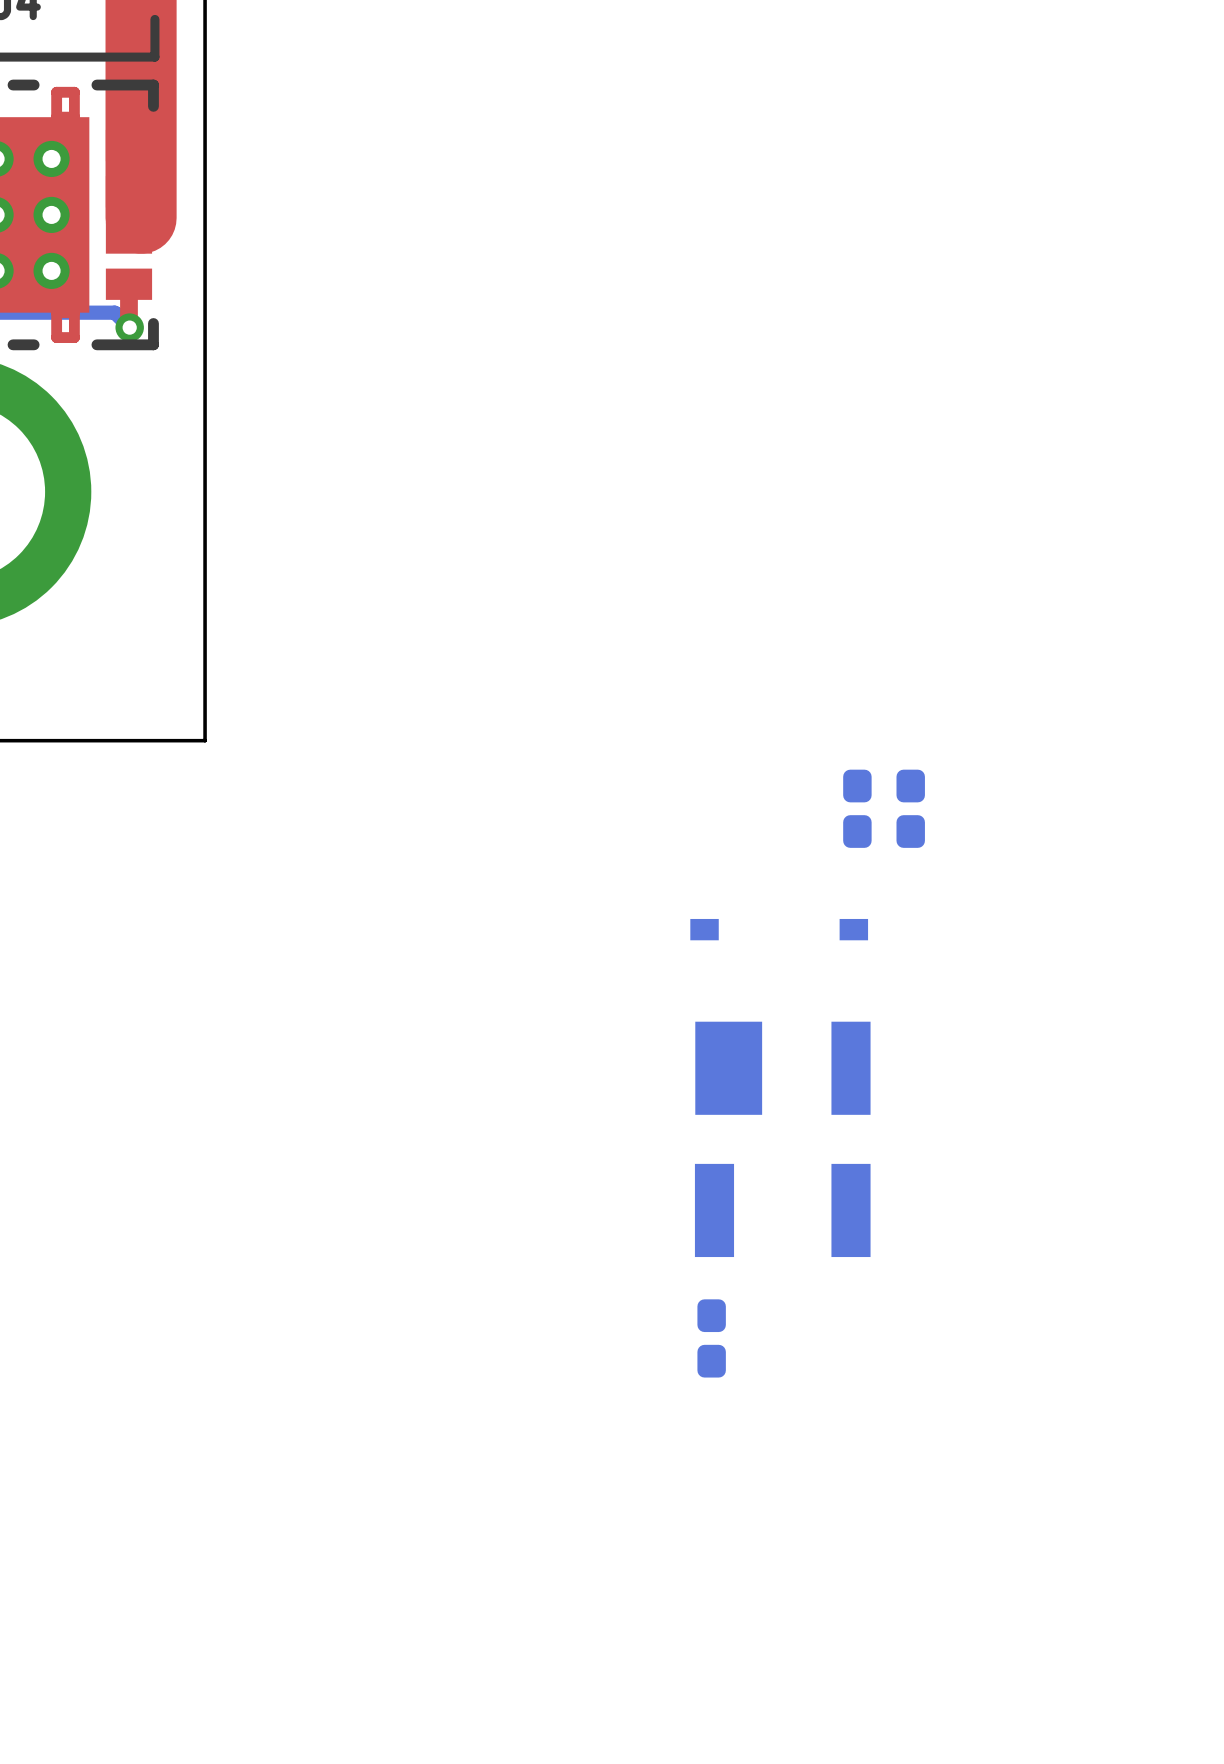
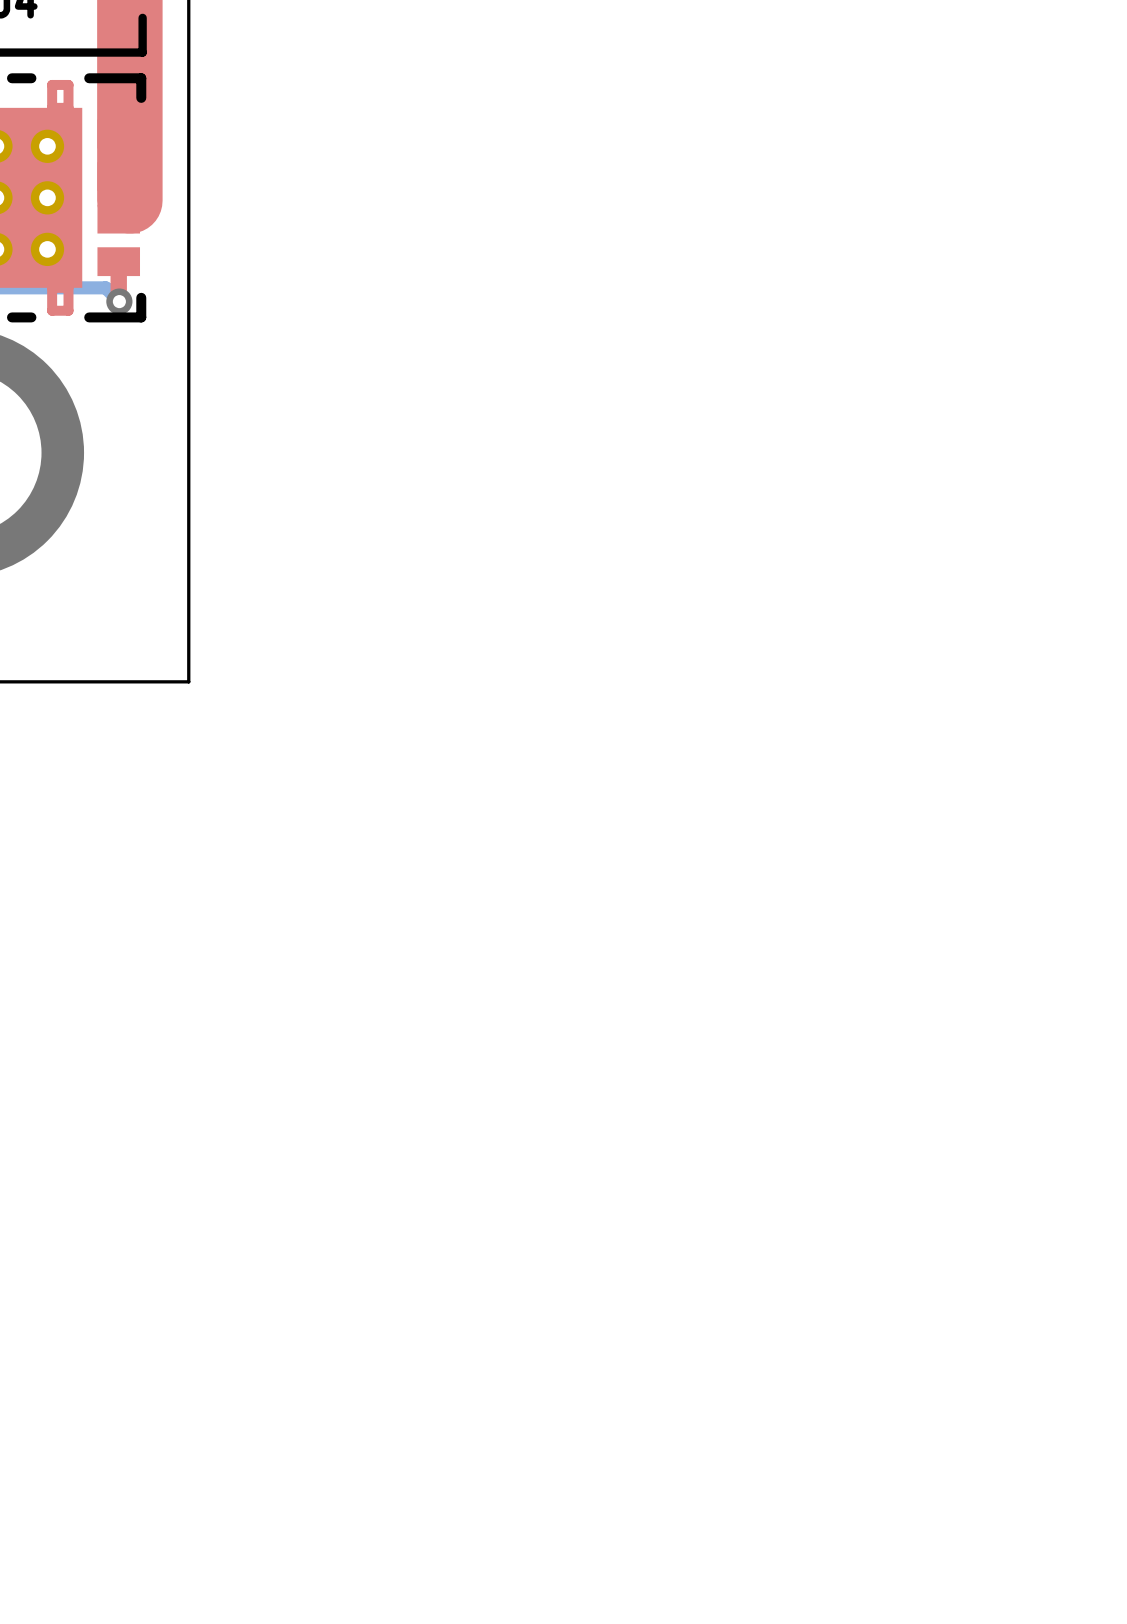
part: (857, 808) -> none
part: (910, 808) -> none
part: (779, 929) -> none
part: (782, 1139) -> none
part: (711, 1338) -> none

